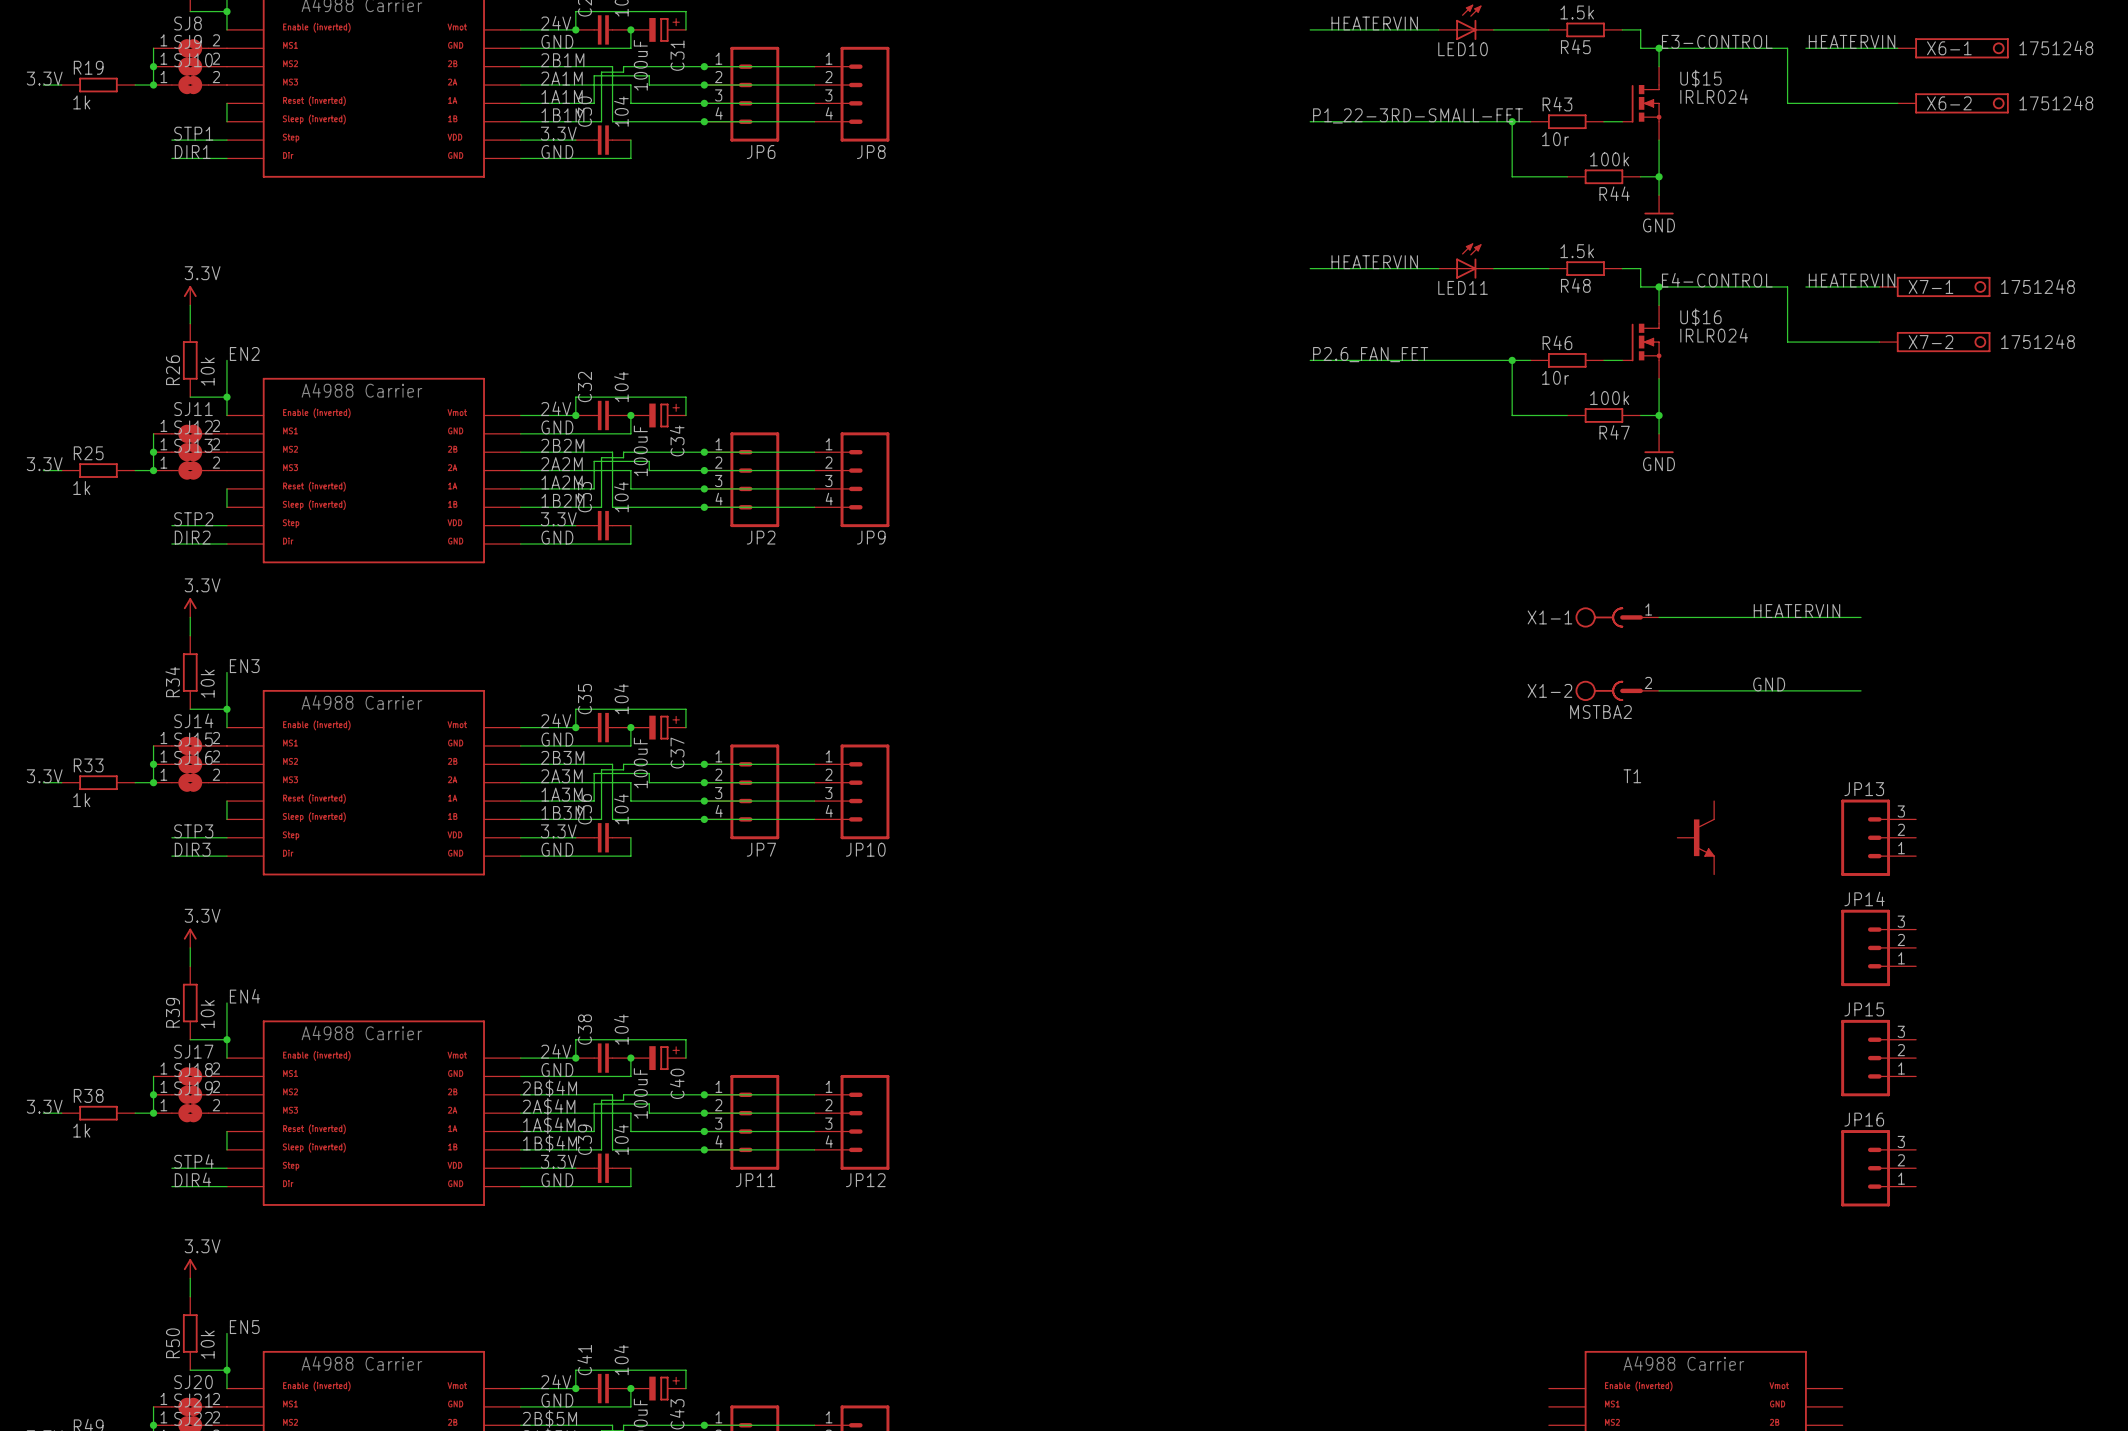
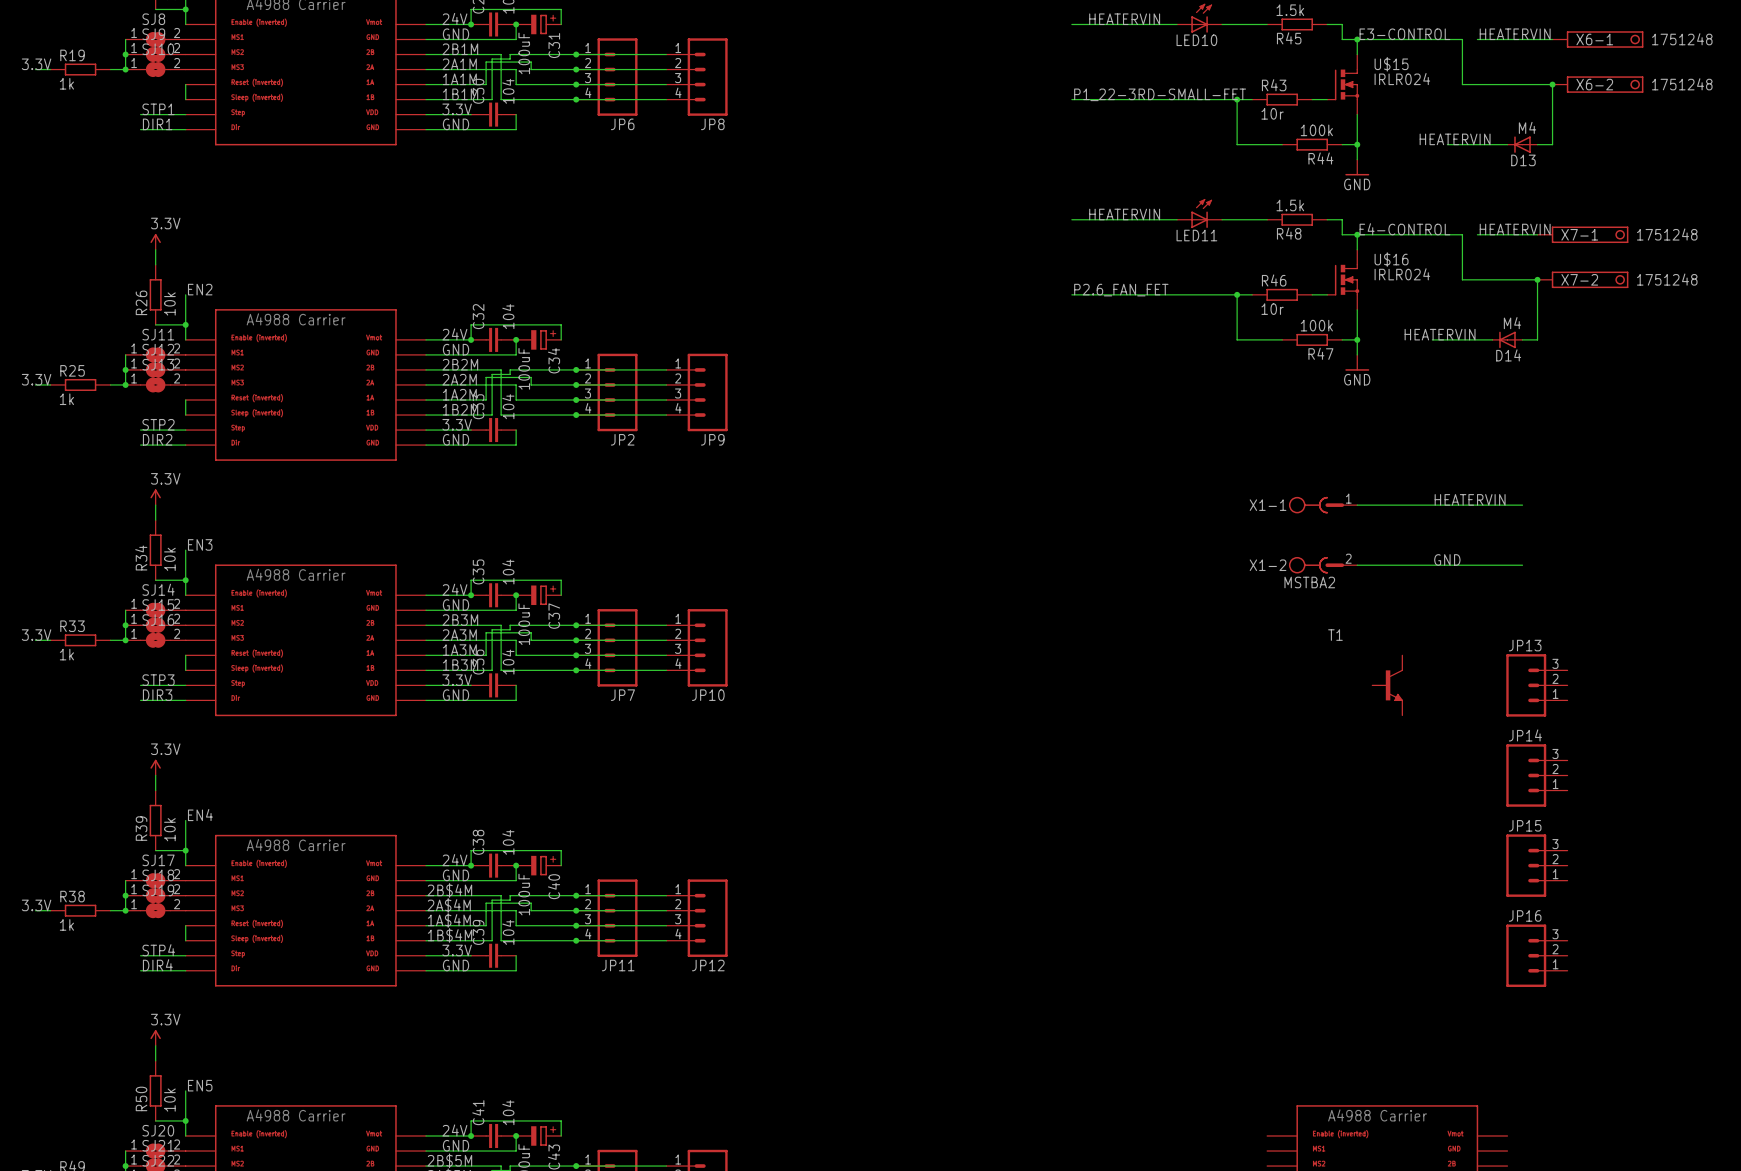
wire: none -> (1552, 84) (1552, 144) (1537, 144)
junction: none -> (1552, 84)
label: none -> HEATERVIN (1455, 139)
wire: none -> (1447, 144) (1507, 144)
D13: none -> M4 (1522, 144)
wire: none -> (1537, 279) (1537, 339) (1522, 339)
junction: none -> (1537, 279)
label: none -> HEATERVIN (1440, 334)
wire: none -> (1432, 339) (1492, 339)
D14: none -> M4 (1507, 339)

